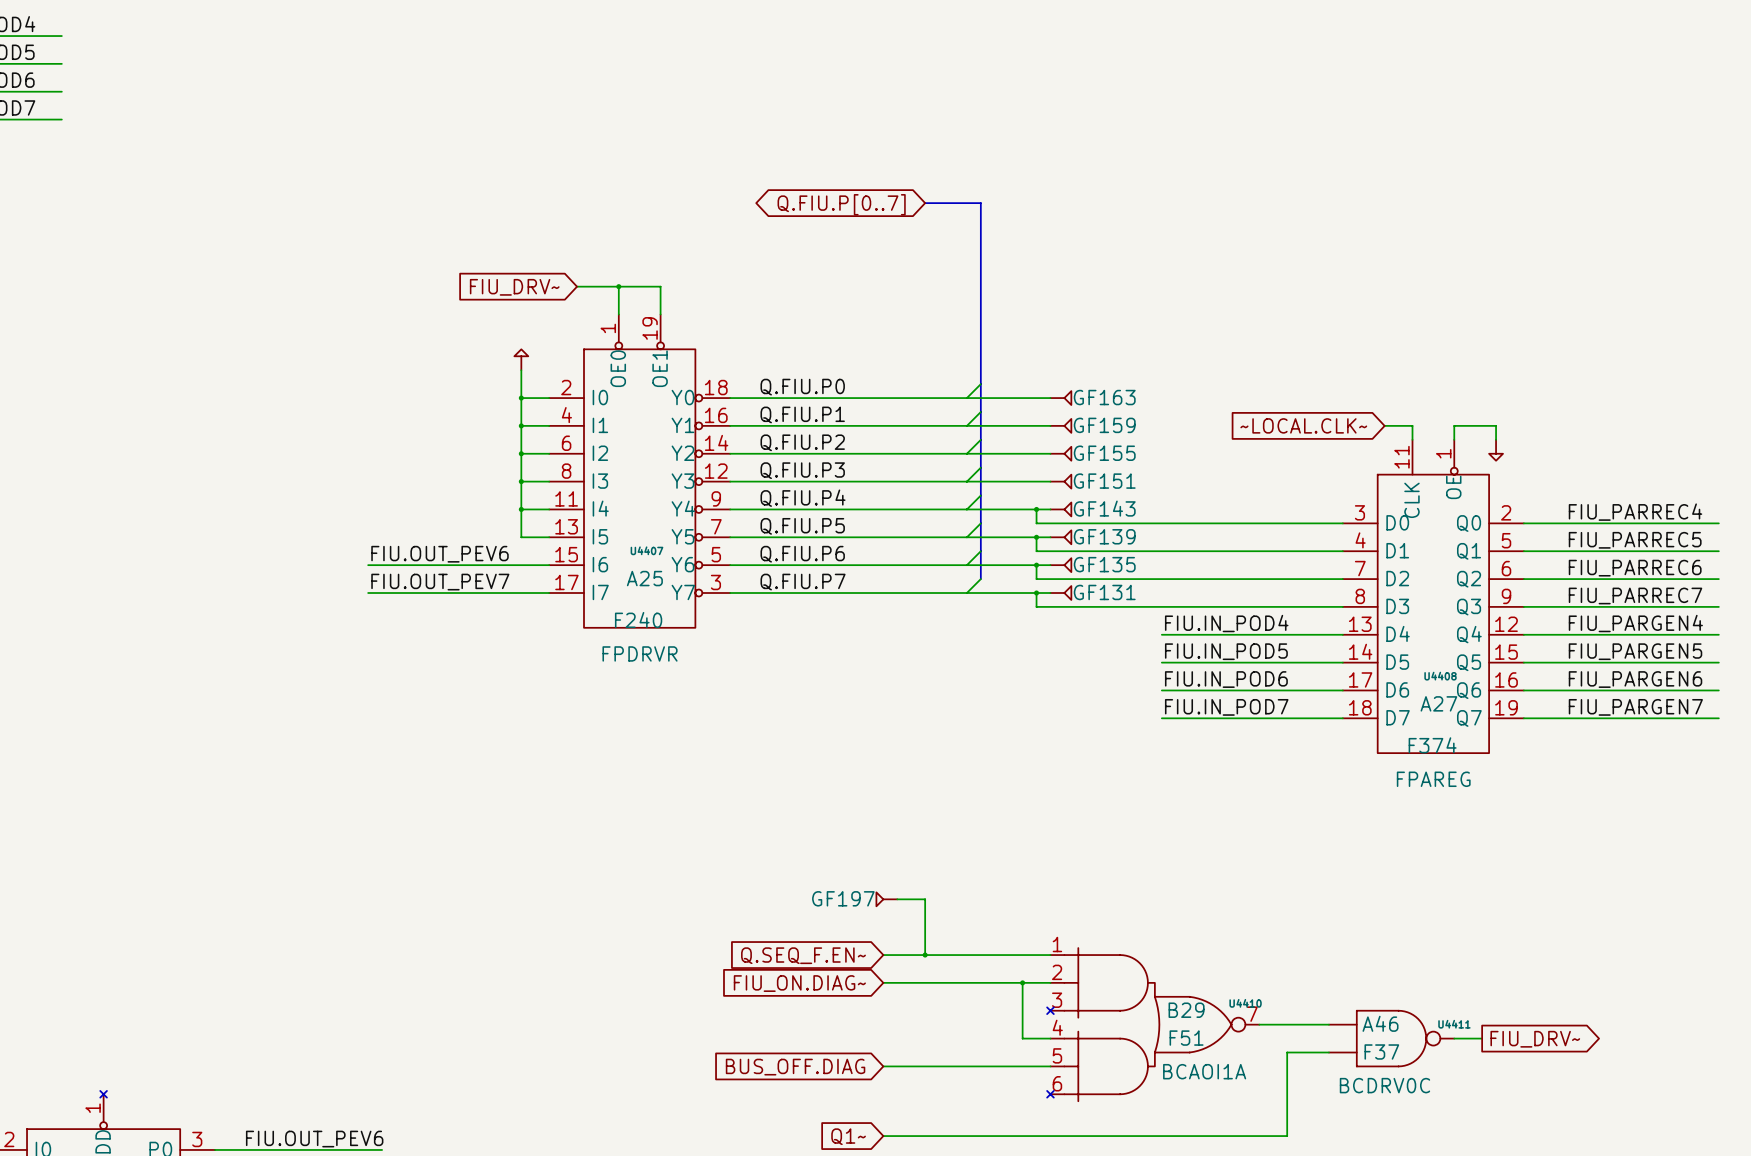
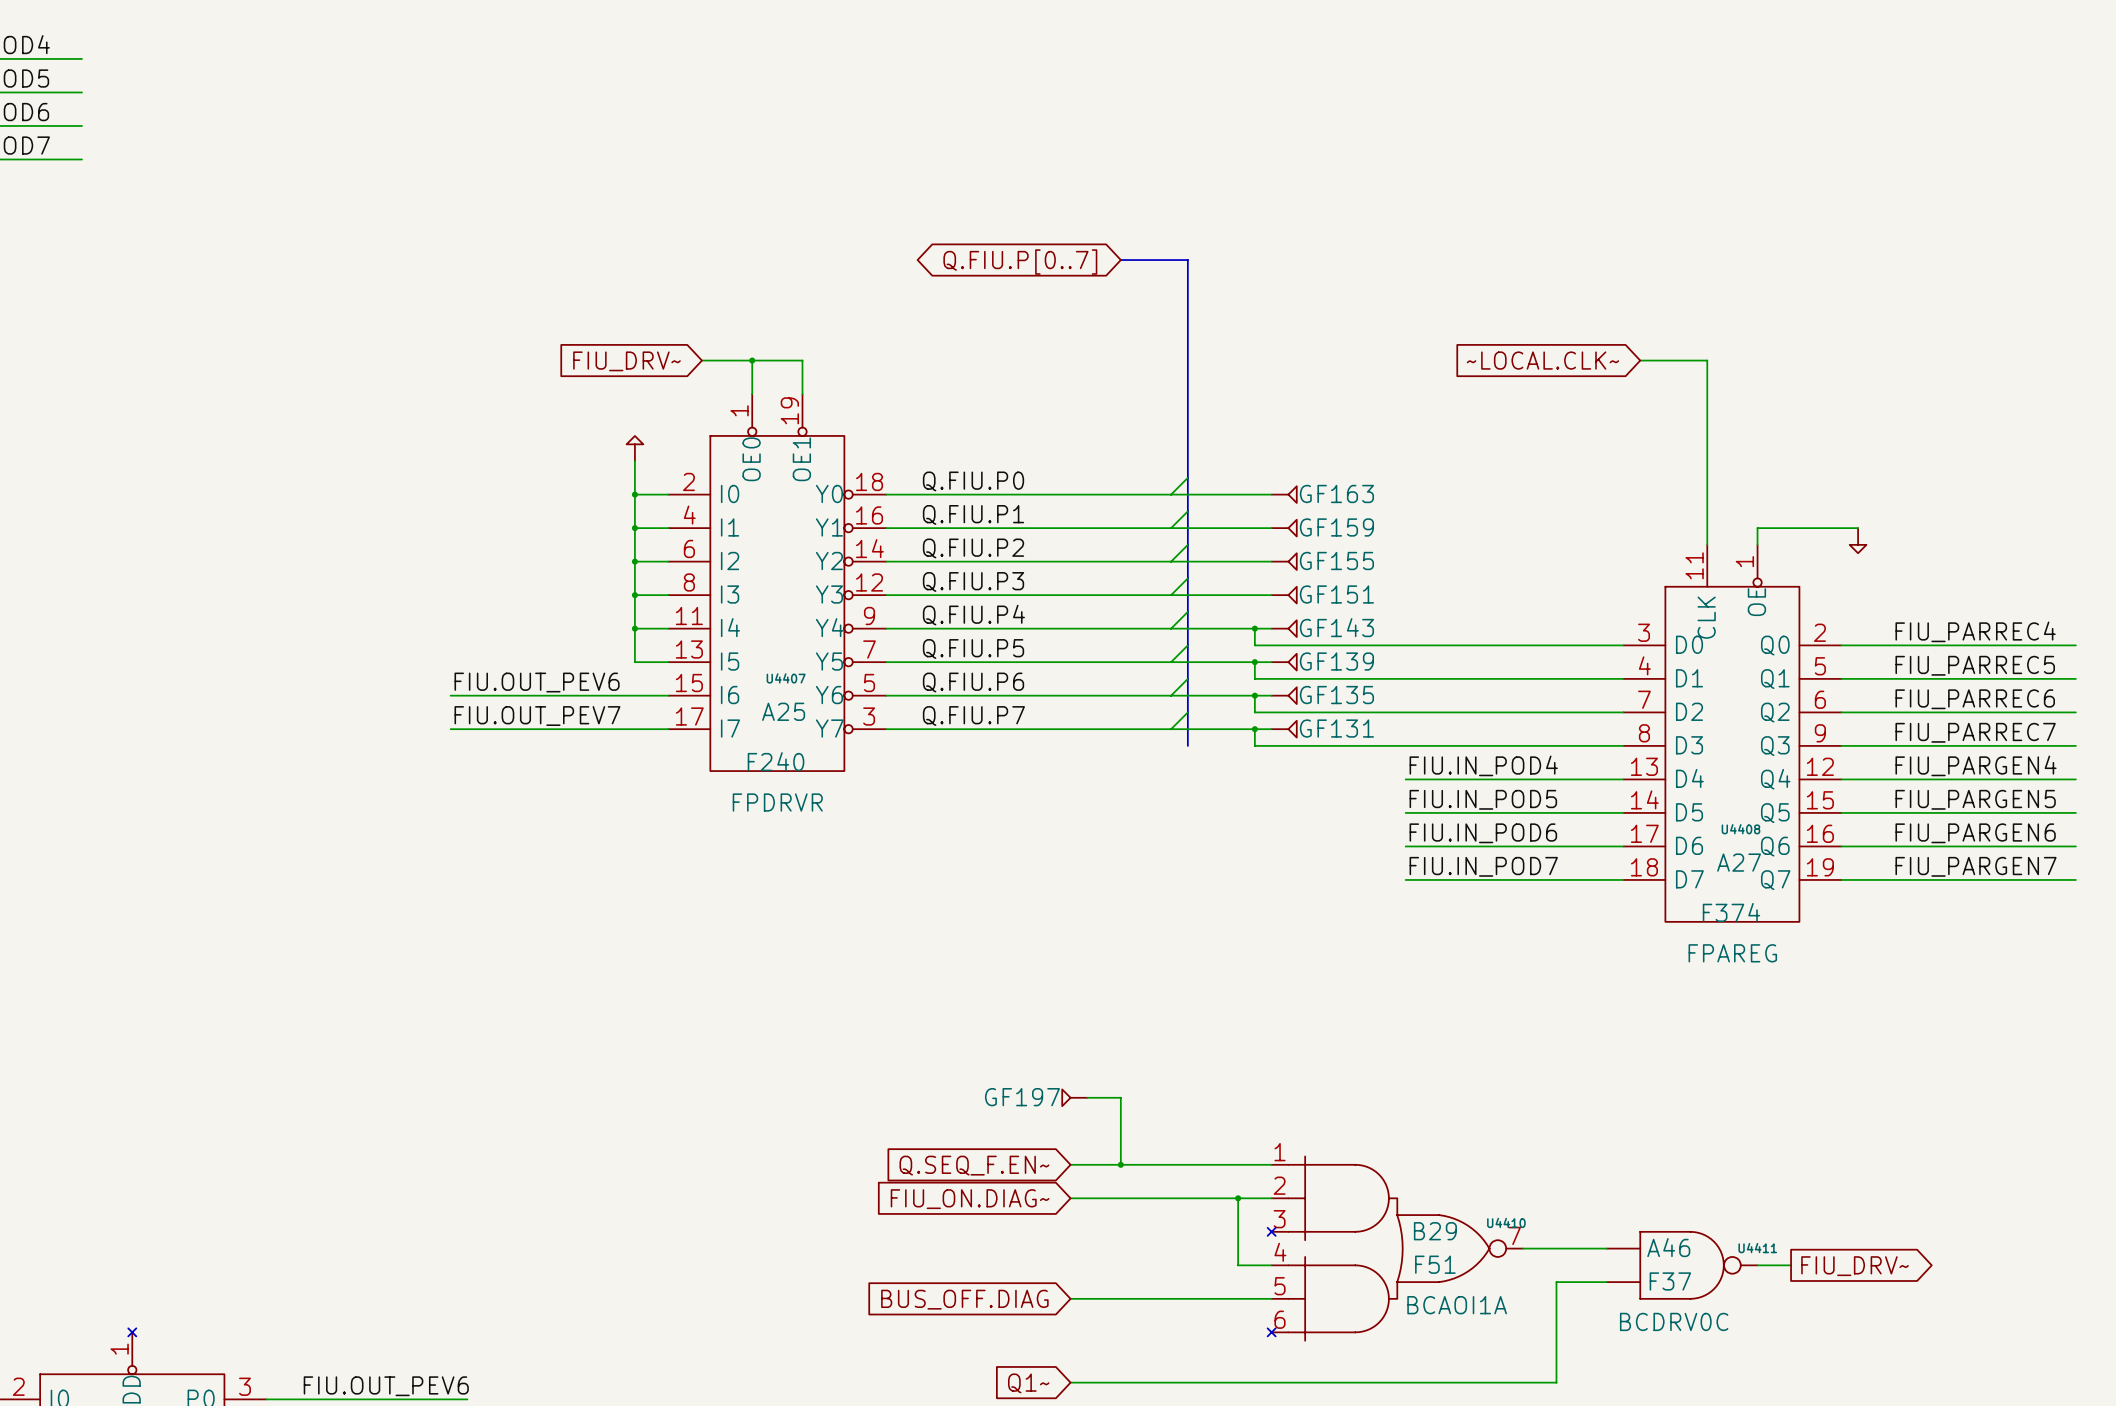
global label: none -> ~LOCAL.CLK~ (1542, 360)
global label: ~LOCAL.CLK~ (1303, 425) -> none
wire: (1384, 425) (1412, 425) -> (1640, 360) (1707, 360) (1707, 528)
wire: (1496, 425) (1496, 439) -> (1807, 528) (1858, 528)
power symbol position: (1496, 450) -> (1858, 540)
bus: none -> (1187, 712) (1187, 745)

